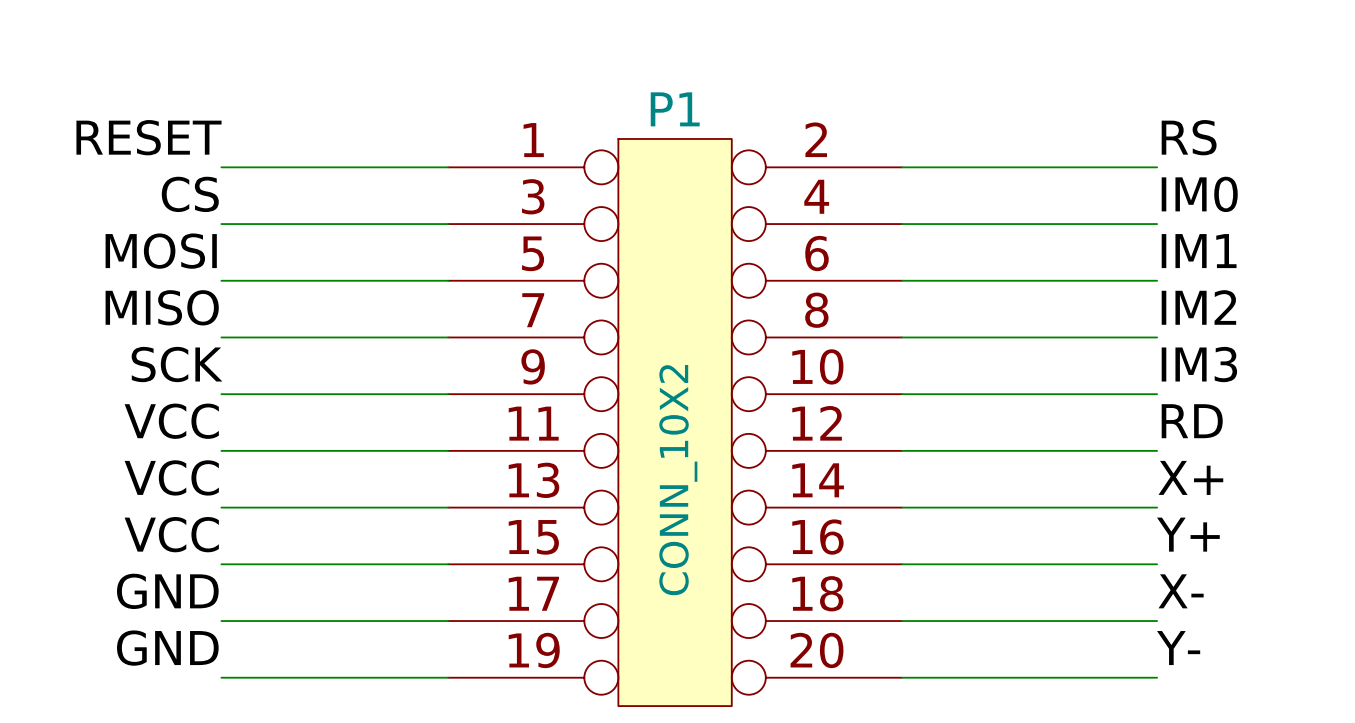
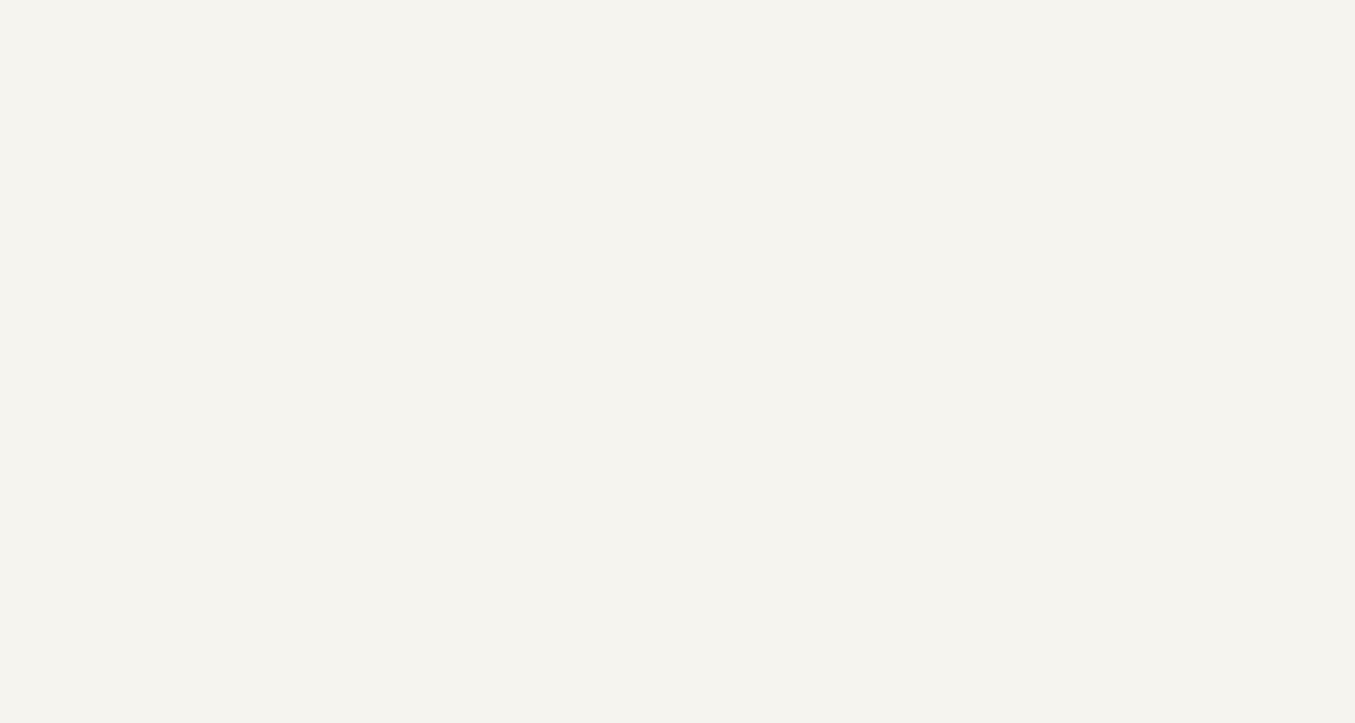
label: RESET (148, 137) -> none
label: RS (1189, 137) -> none
wire: (221, 167) (448, 167) -> none
wire: (901, 167) (1157, 167) -> none
label: CS (190, 194) -> none
label: IM0 (1199, 194) -> none
wire: (221, 224) (448, 224) -> none
wire: (901, 224) (1157, 224) -> none
label: MOSI (161, 251) -> none
label: IM1 (1199, 251) -> none
wire: (221, 280) (448, 280) -> none
wire: (901, 280) (1157, 280) -> none
label: MISO (162, 307) -> none
label: IM2 (1198, 307) -> none
wire: (221, 337) (448, 337) -> none
wire: (901, 337) (1157, 337) -> none
label: SCK (177, 364) -> none
label: IM3 (1199, 364) -> none
wire: (221, 394) (448, 394) -> none
wire: (901, 394) (1157, 394) -> none
label: VCC (171, 421) -> none
label: RD (1192, 421) -> none
P1: CONN_10X2 (675, 422) -> none
wire: (221, 450) (448, 450) -> none
wire: (901, 450) (1157, 450) -> none
label: VCC (171, 477) -> none
label: X+ (1190, 477) -> none
wire: (221, 507) (448, 507) -> none
wire: (901, 507) (1157, 507) -> none
label: VCC (171, 534) -> none
label: Y+ (1188, 534) -> none
wire: (221, 564) (448, 564) -> none
wire: (901, 564) (1157, 564) -> none
label: GND (167, 591) -> none
label: X- (1181, 591) -> none
wire: (221, 621) (448, 621) -> none
wire: (901, 621) (1157, 621) -> none
label: GND (167, 648) -> none
label: Y- (1178, 648) -> none
wire: (221, 677) (448, 677) -> none
wire: (901, 677) (1157, 677) -> none

